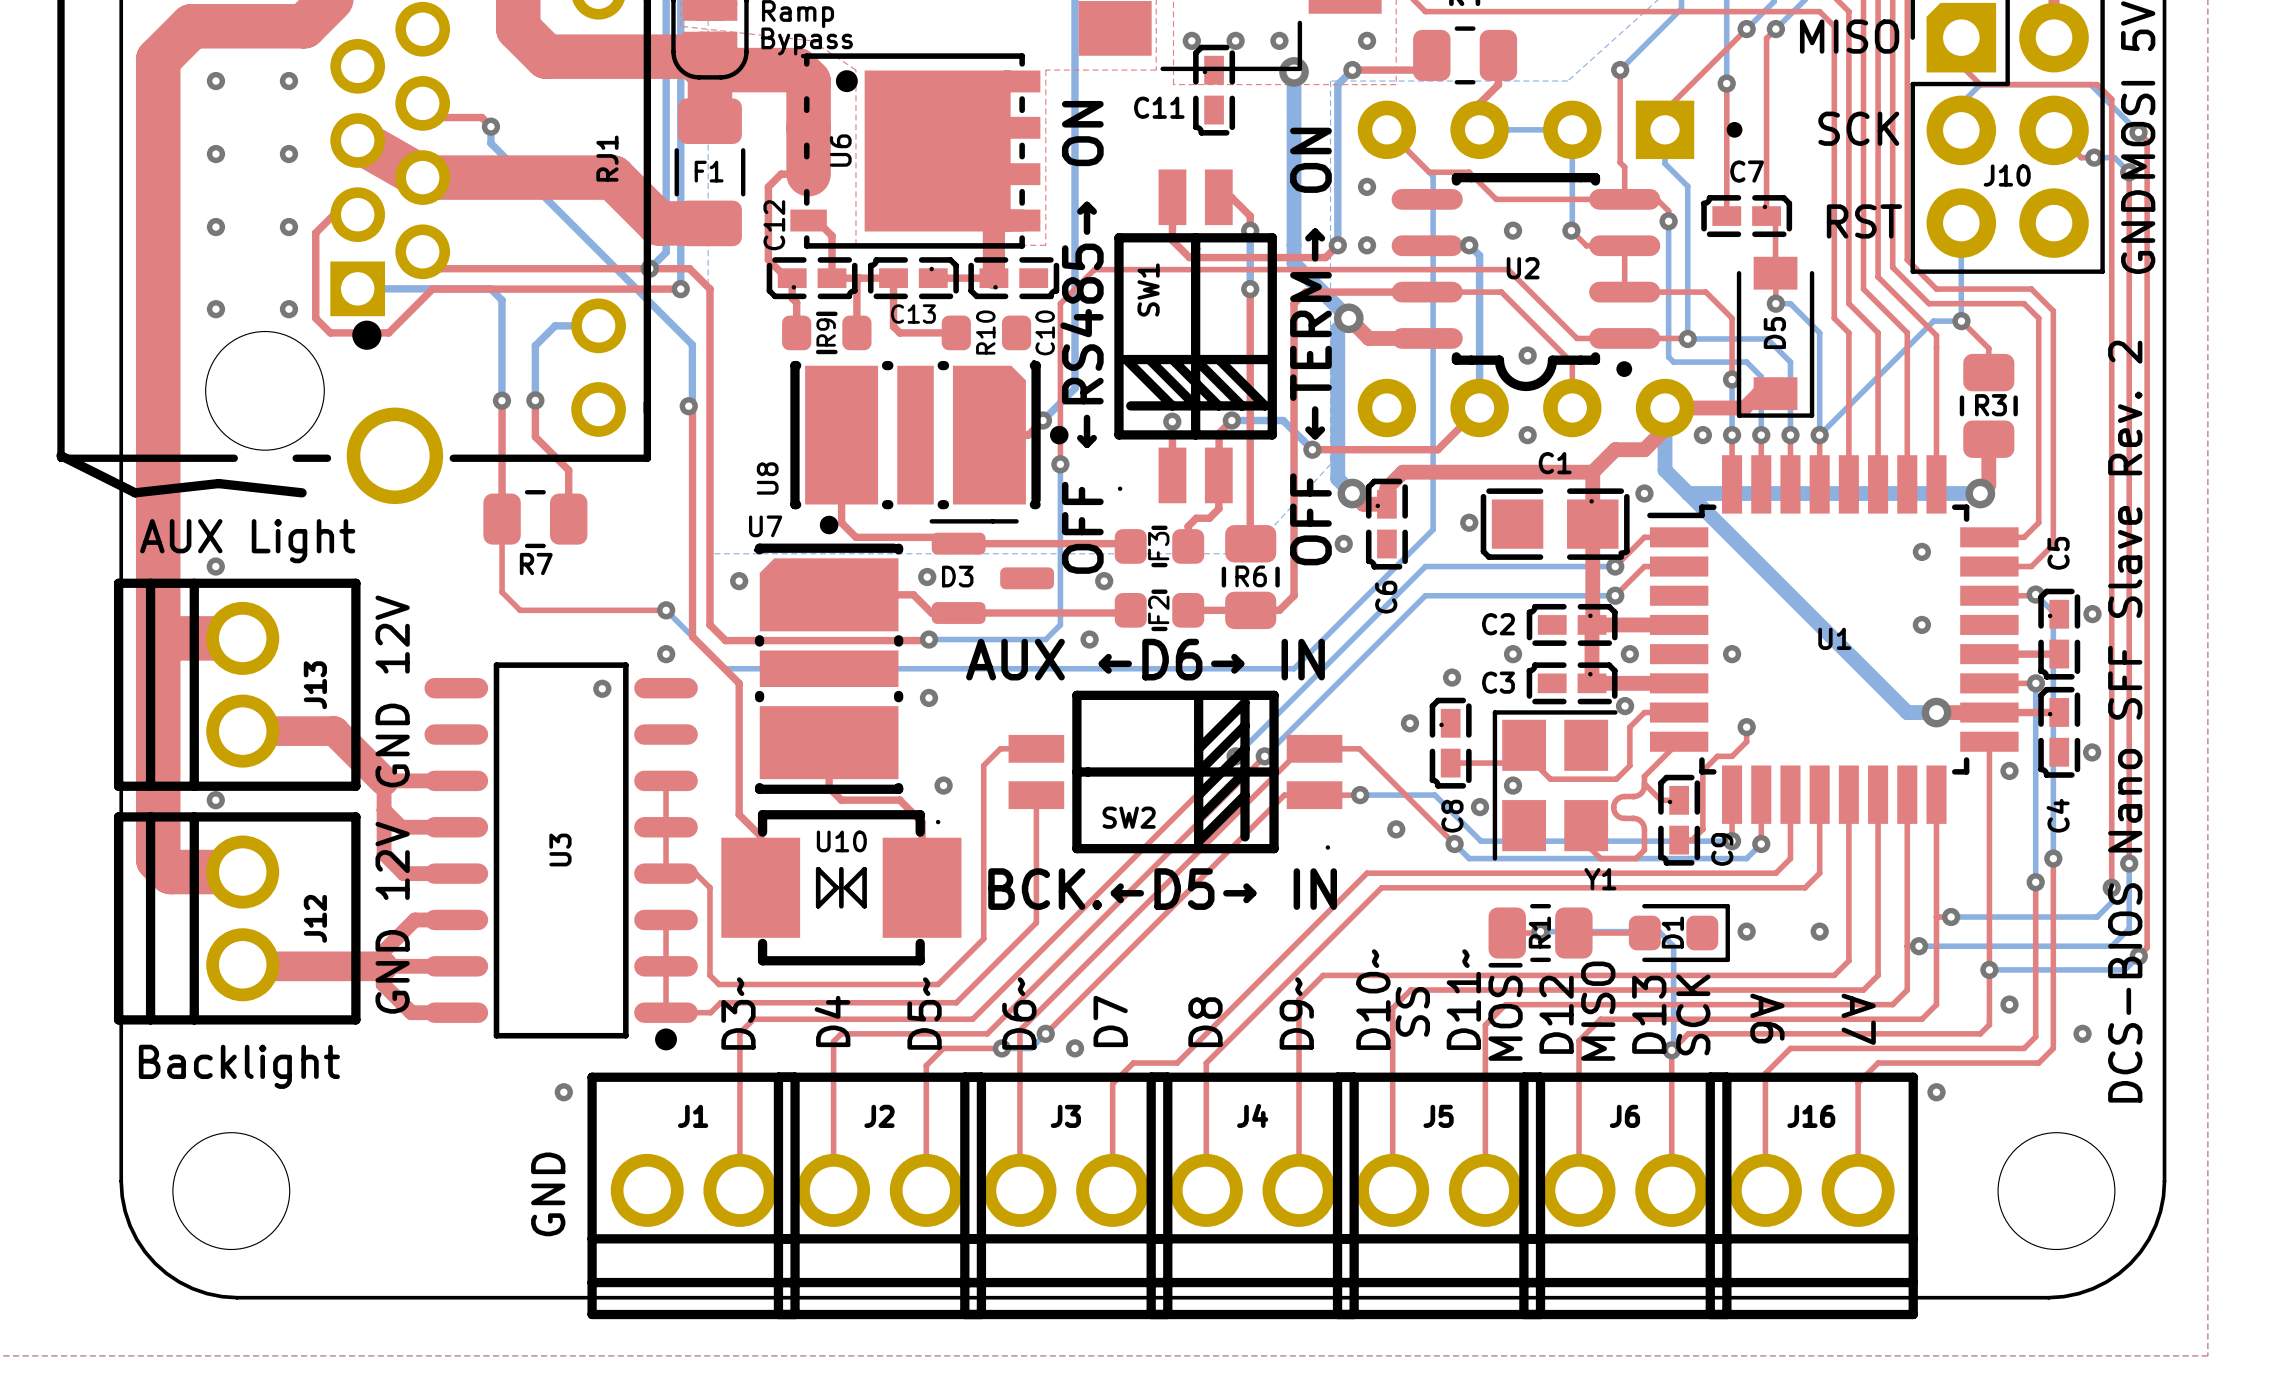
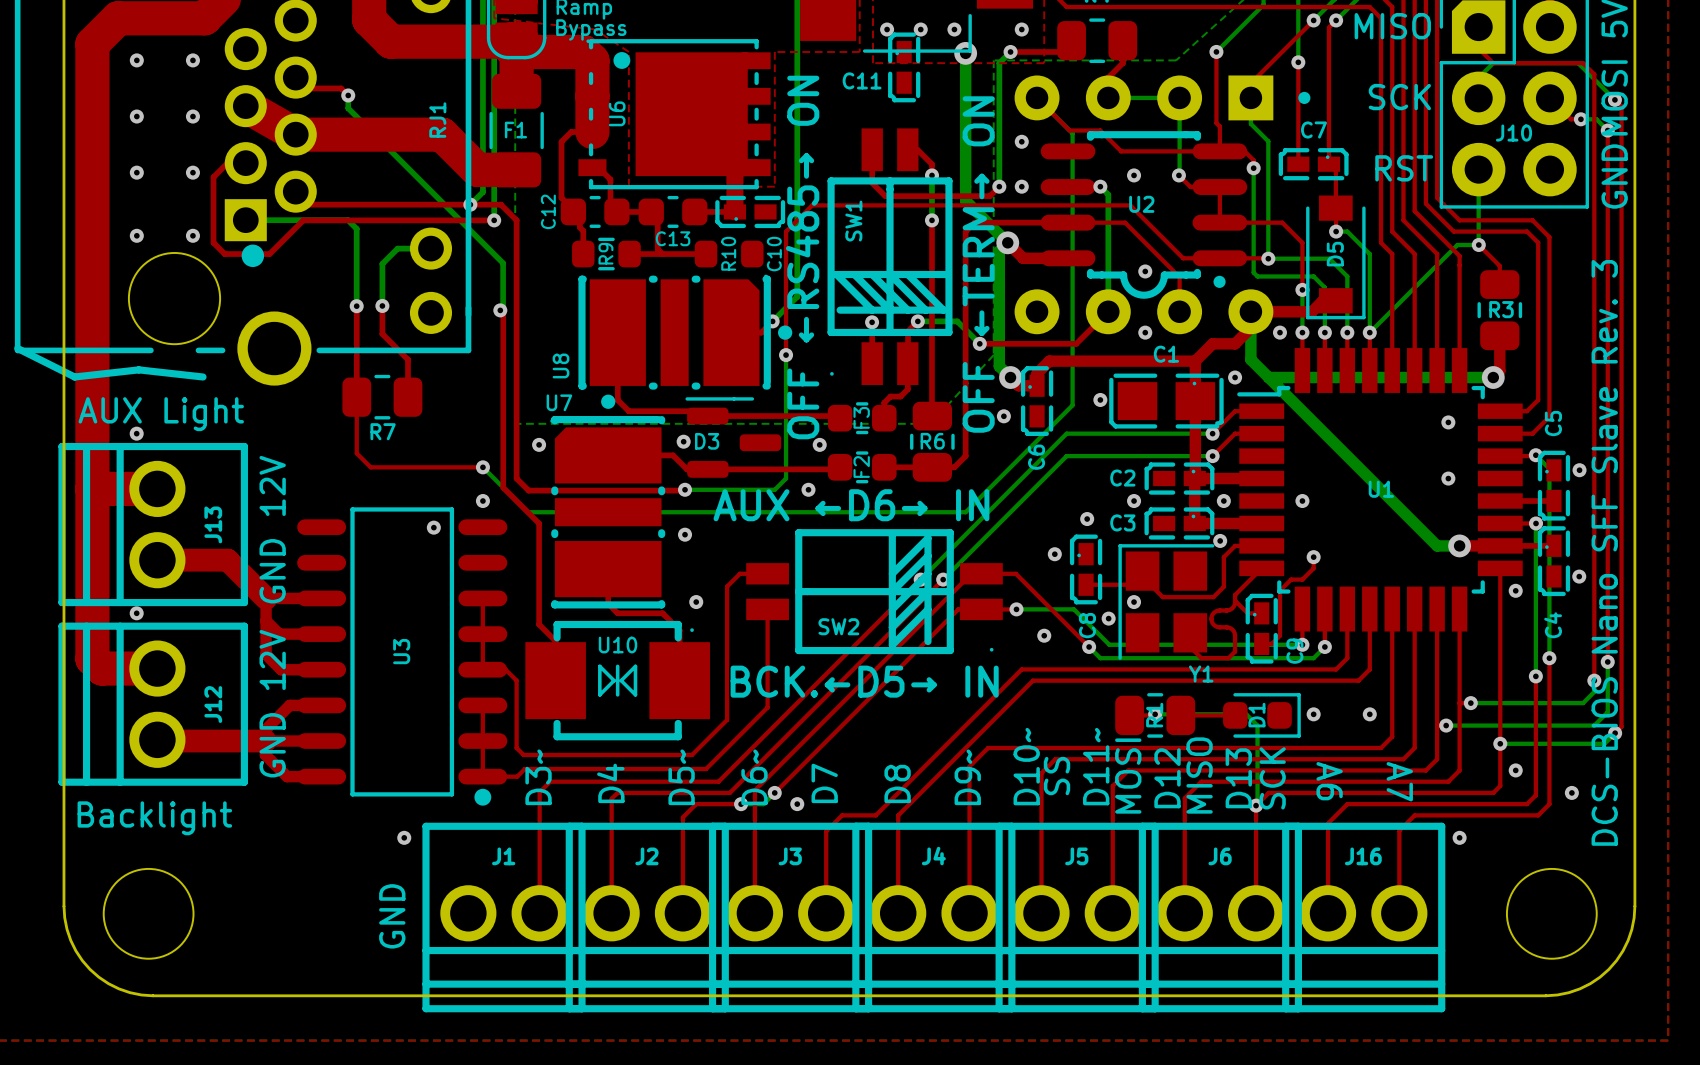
C12 footprint: [766, 257, 858, 300] -> [560, 195, 630, 228]
C13 footprint: [867, 257, 959, 300] -> [638, 195, 708, 228]
top track: (859, 278) (856, 280) (856, 332) -> (662, 254) (629, 254)
text: DCS-BIOS Nano SFF Slave Rev. 2 (2125, 721) -> DCS-BIOS Nano SFF Slave Rev. 3 (1604, 552)

